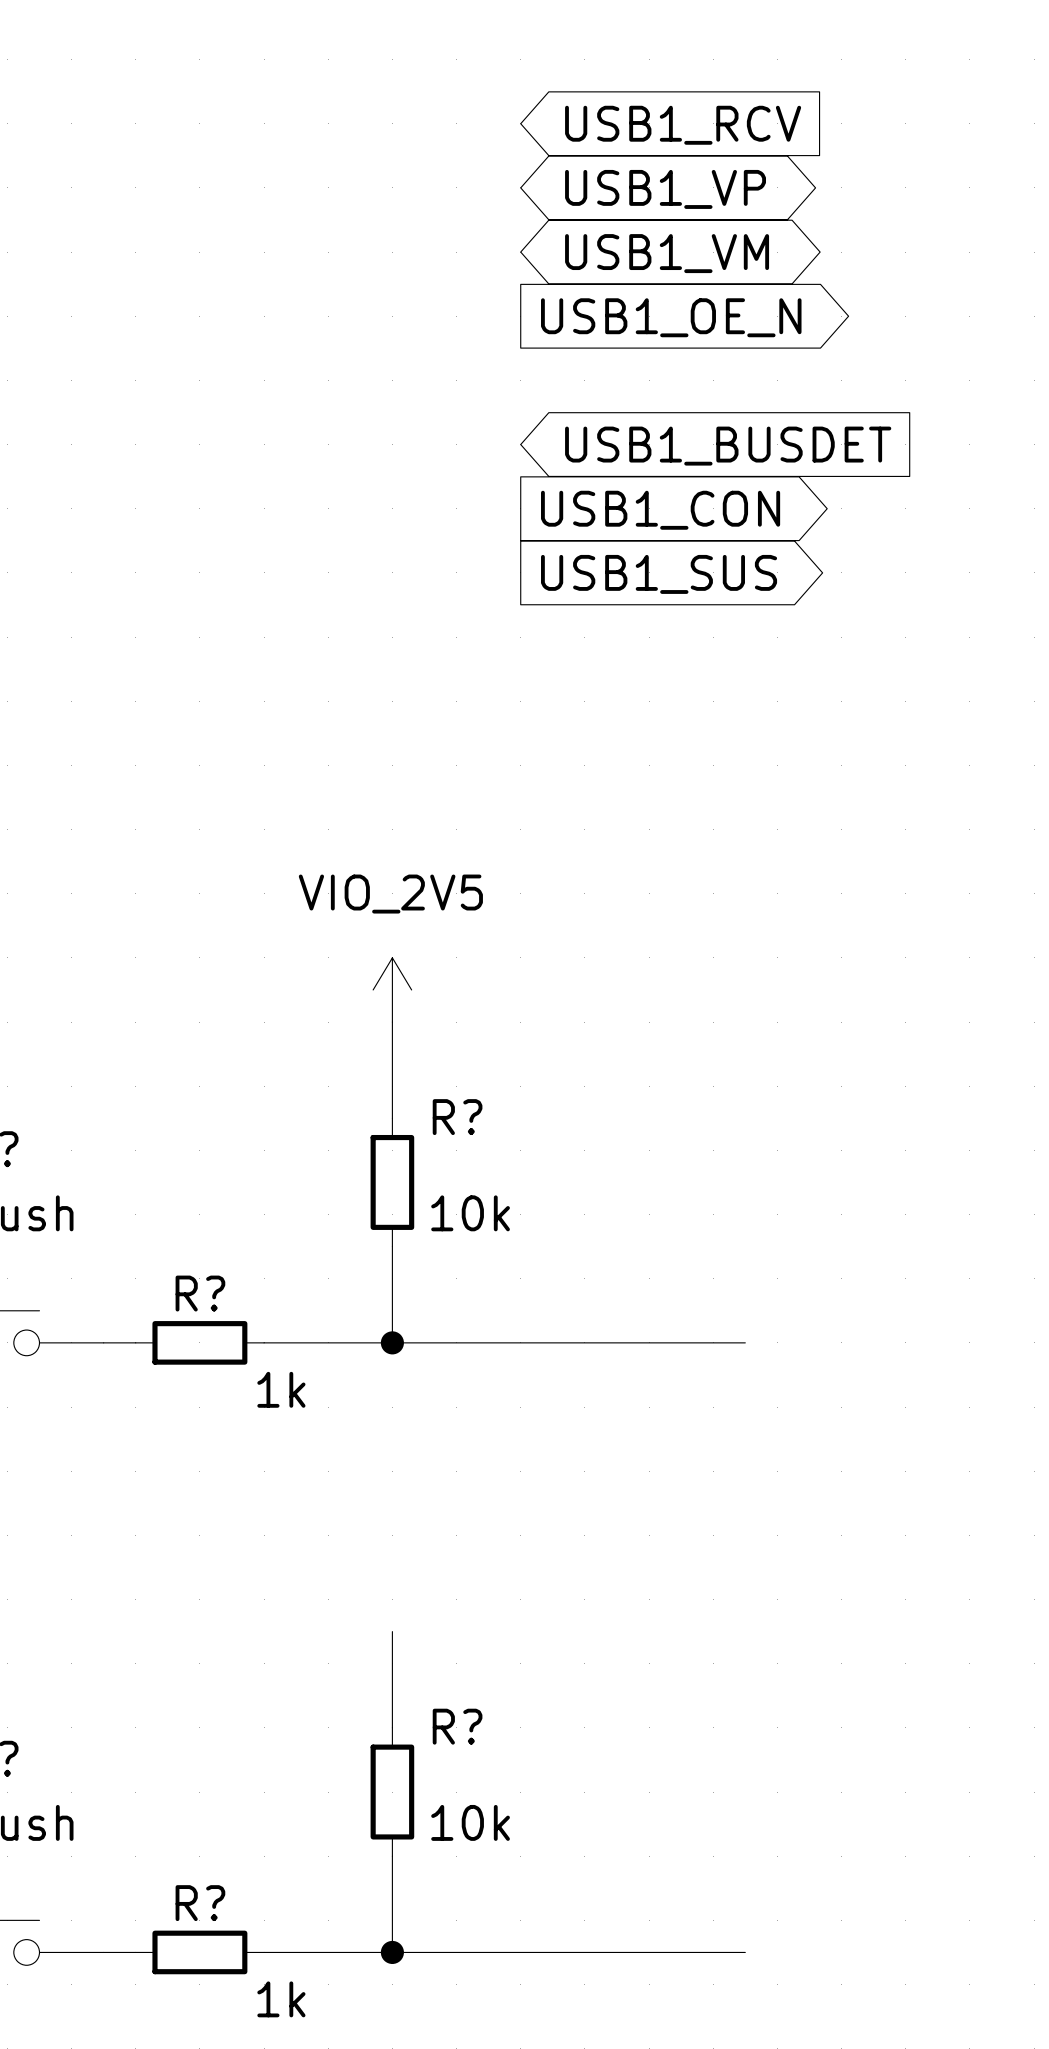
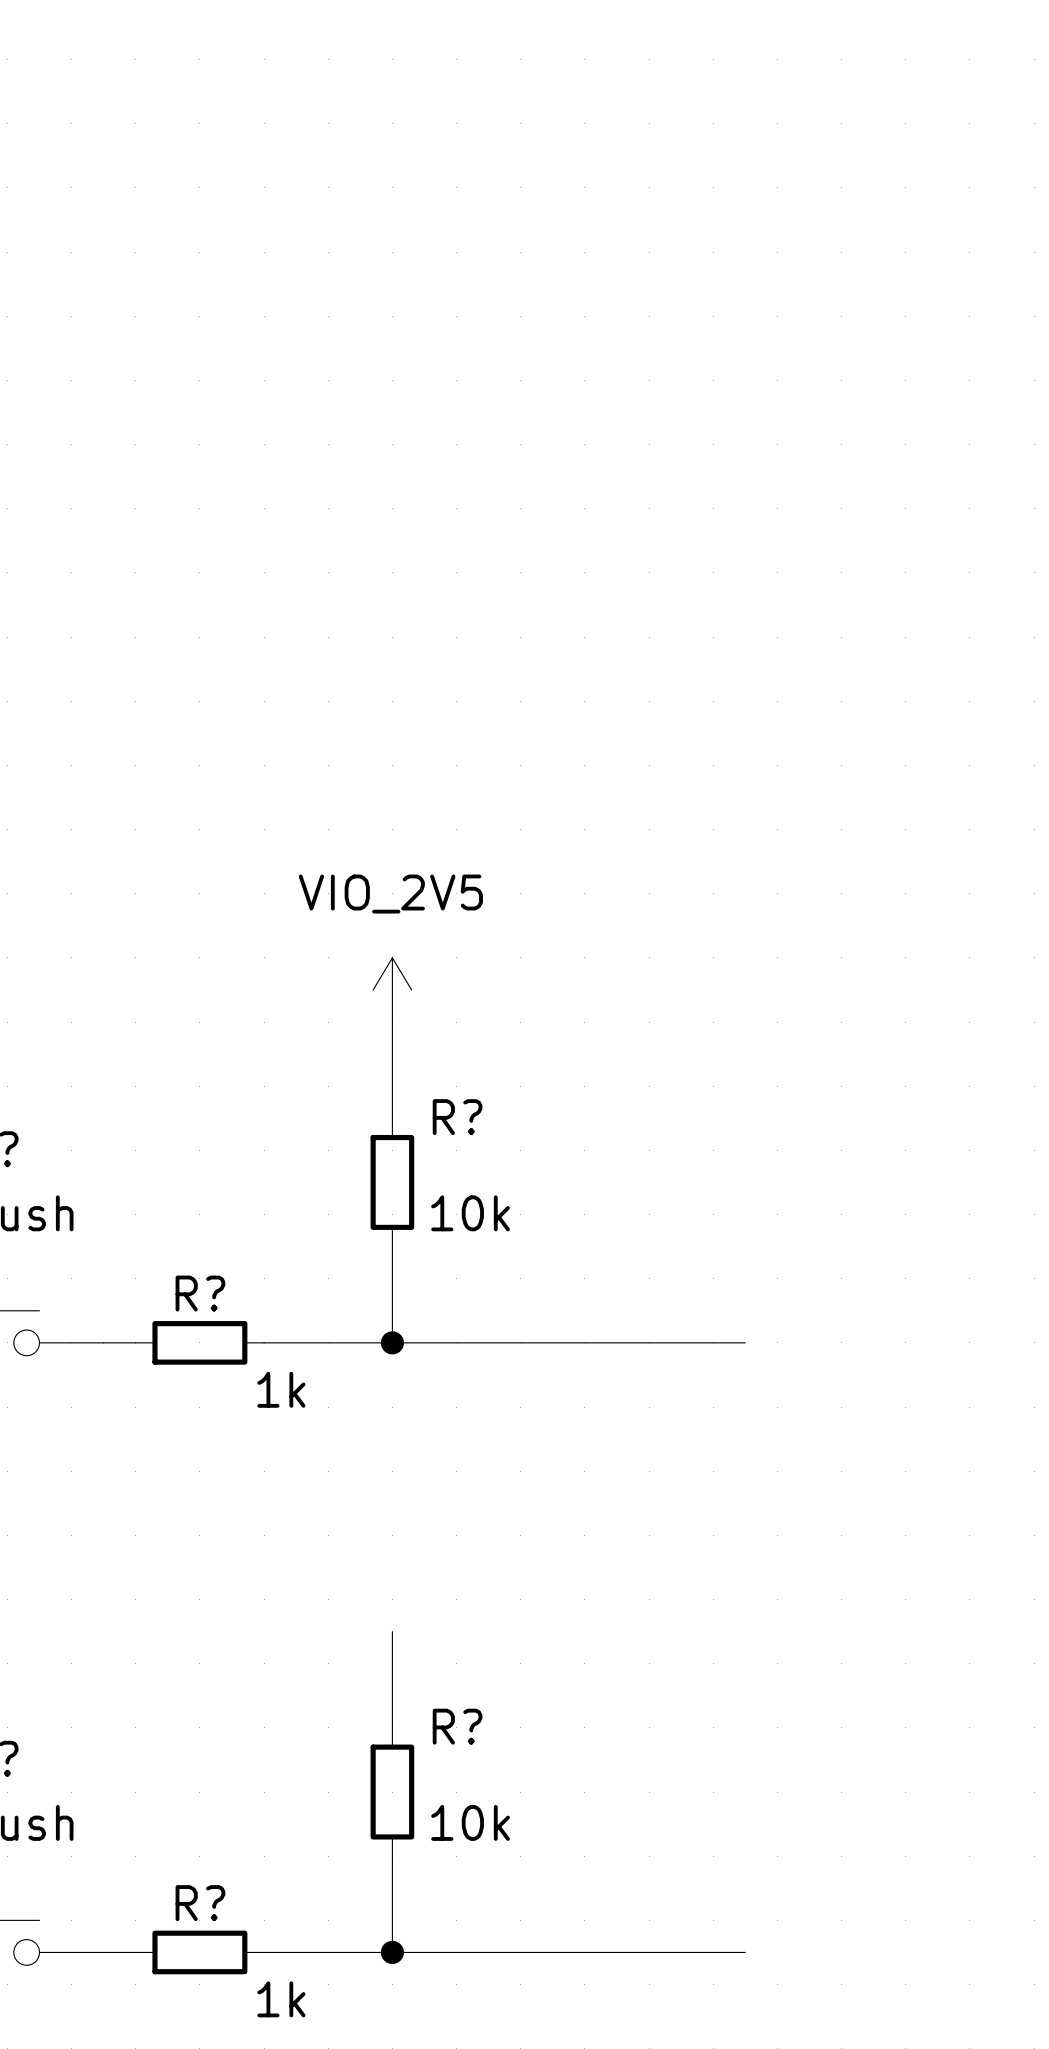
global label: USB1_RCV (683, 125) -> none
global label: USB1_VP (665, 189) -> none
global label: USB1_VM (667, 253) -> none
global label: USB1_OE_N (671, 317) -> none
global label: USB1_BUSDET (728, 446) -> none
global label: USB1_CON (660, 510) -> none
global label: USB1_SUS (659, 574) -> none

